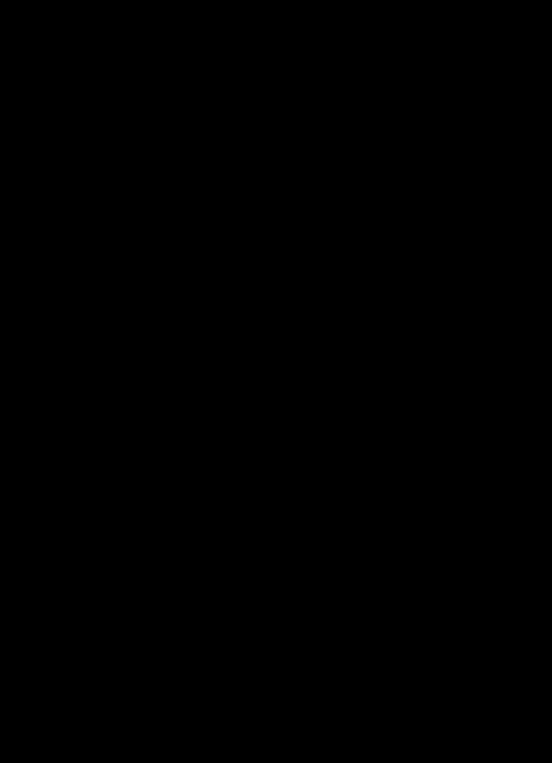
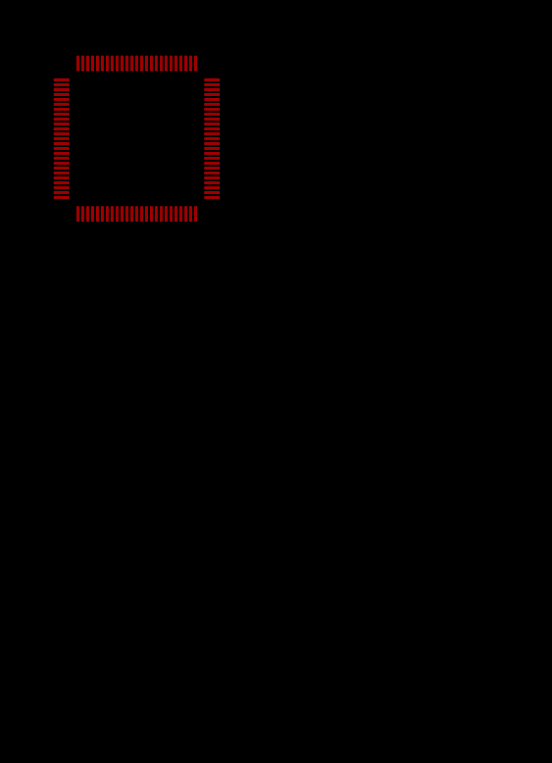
part: none -> (136, 138)

